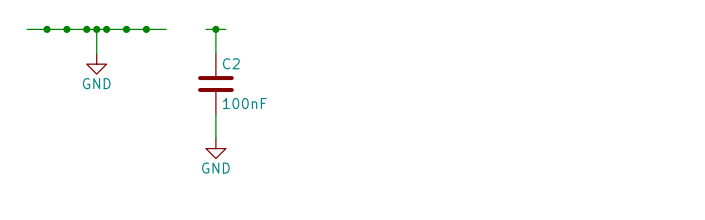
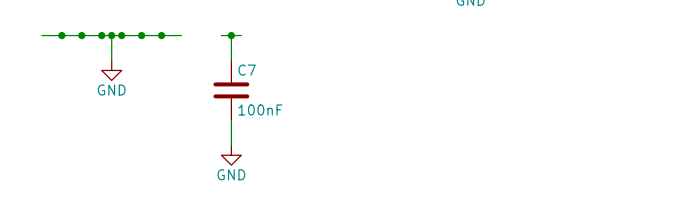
C2 name: C2 (231, 63) -> C7 (247, 70)

